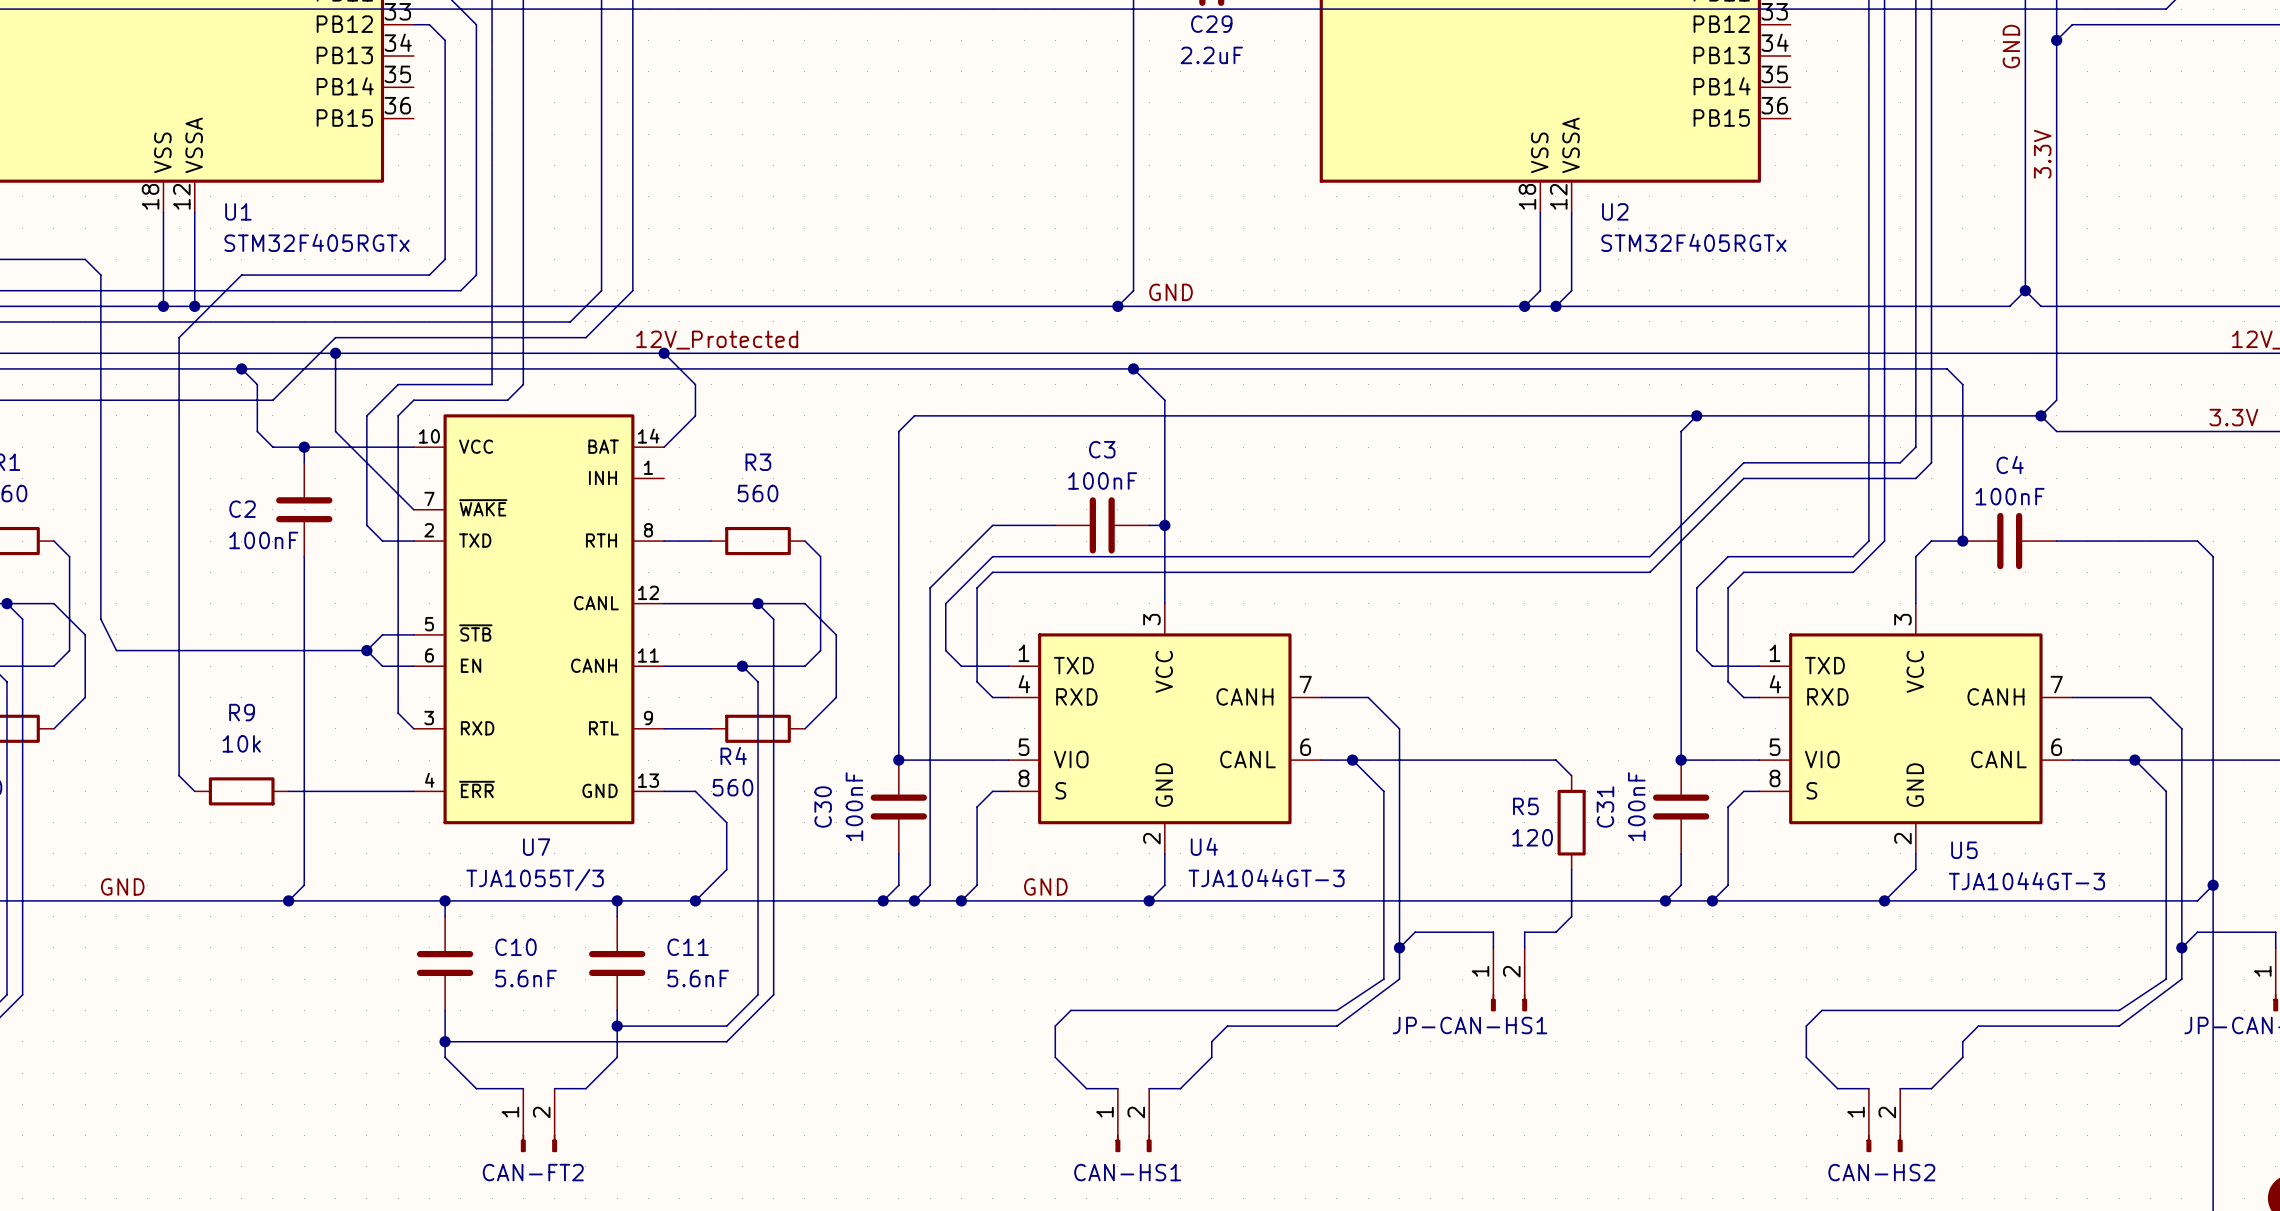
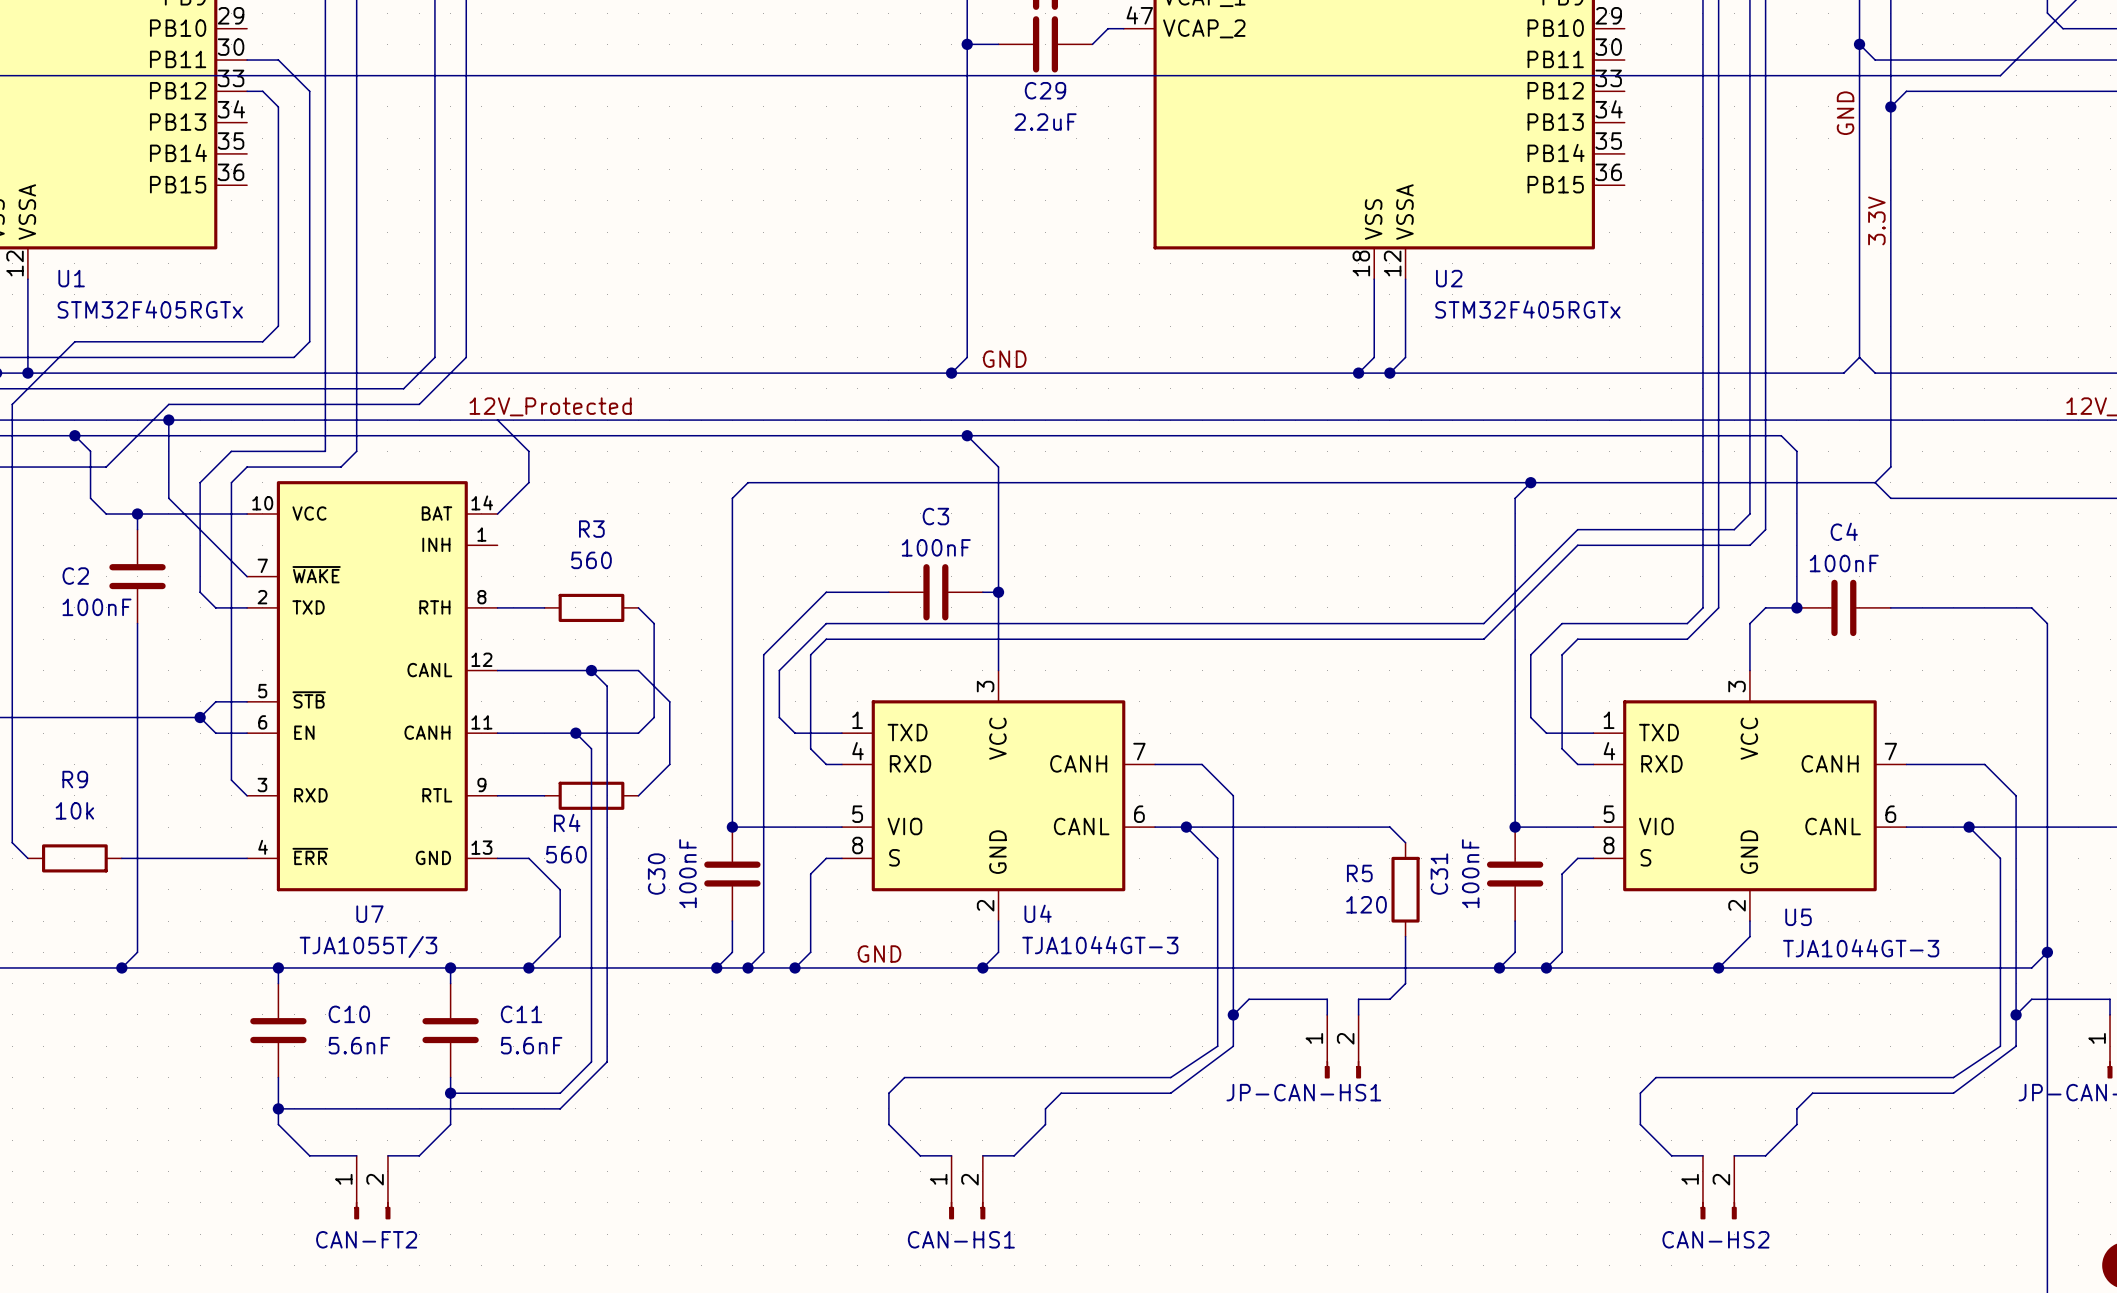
junction: (2025, 290) -> none
junction: (664, 353) -> none
junction: (2041, 415) -> none
label: 3.3V (2233, 417) -> none

